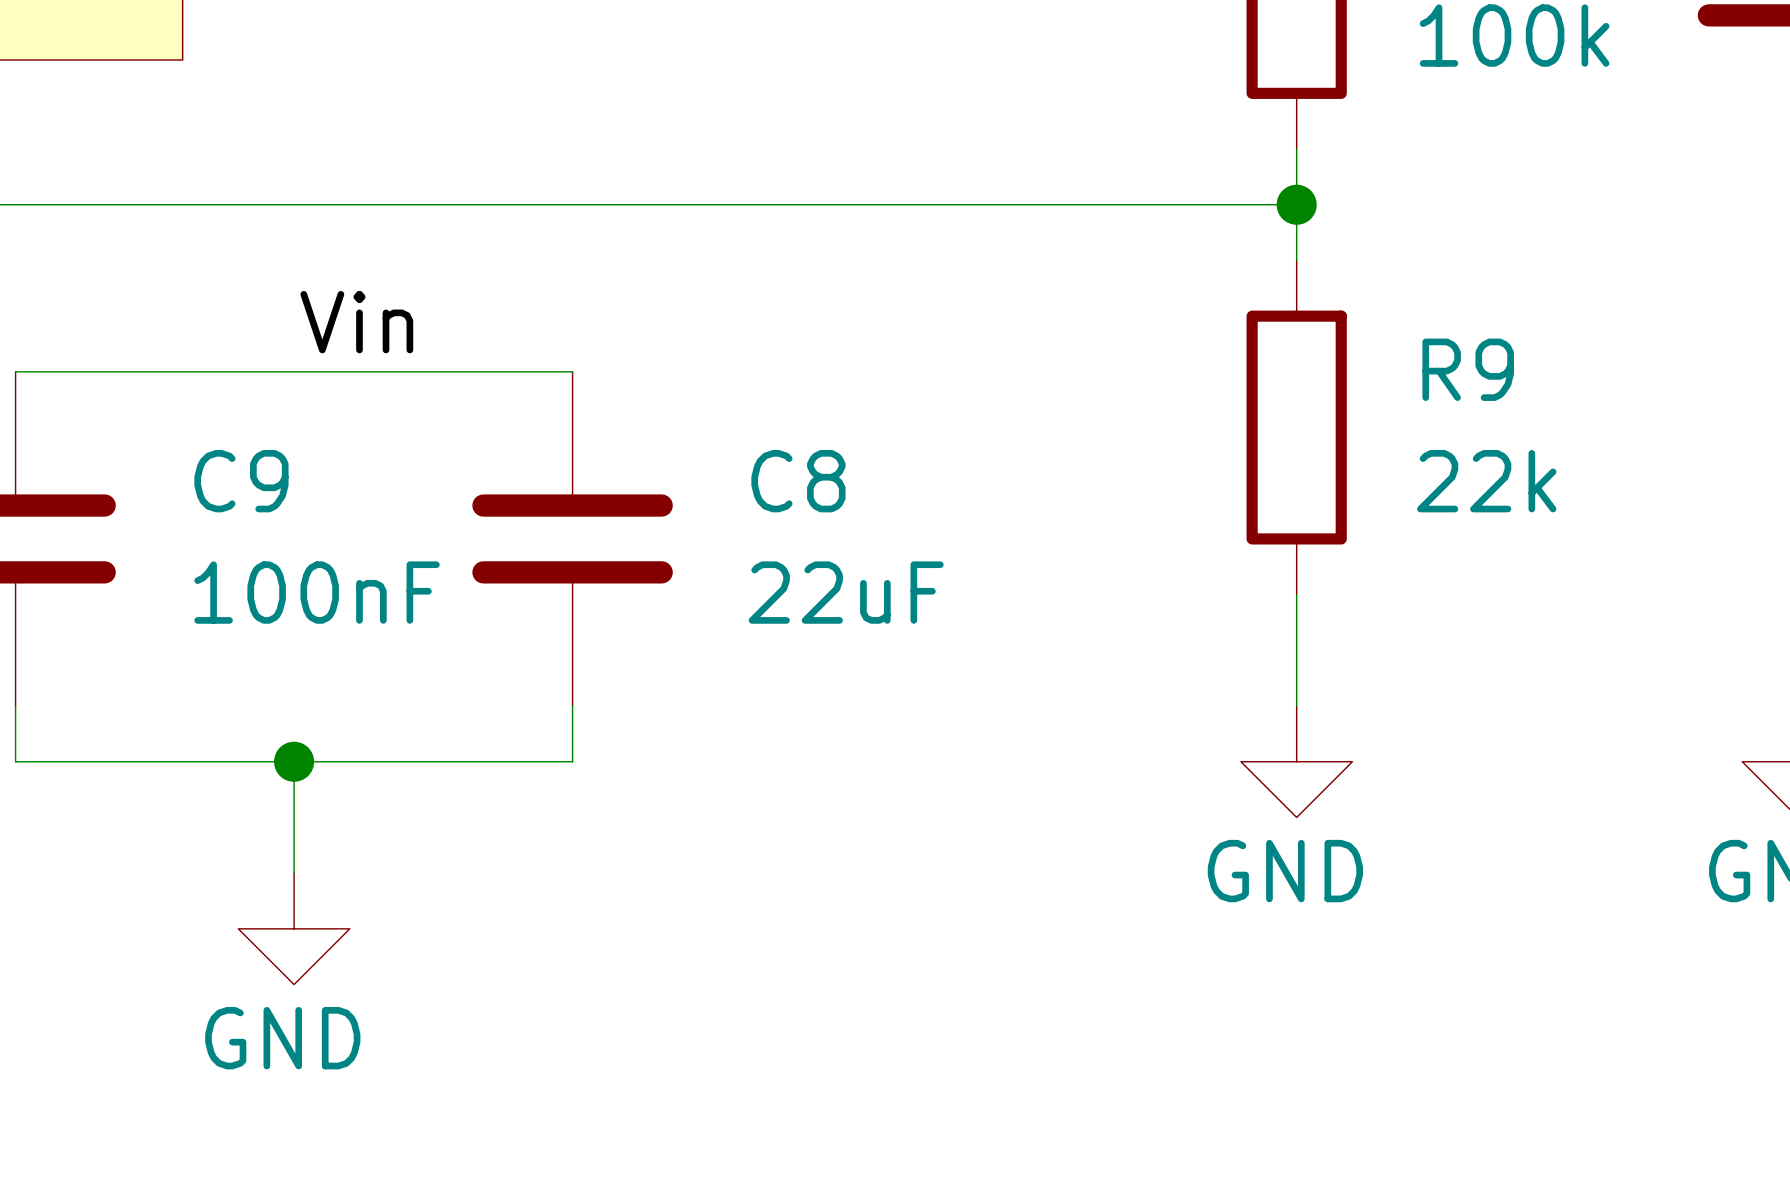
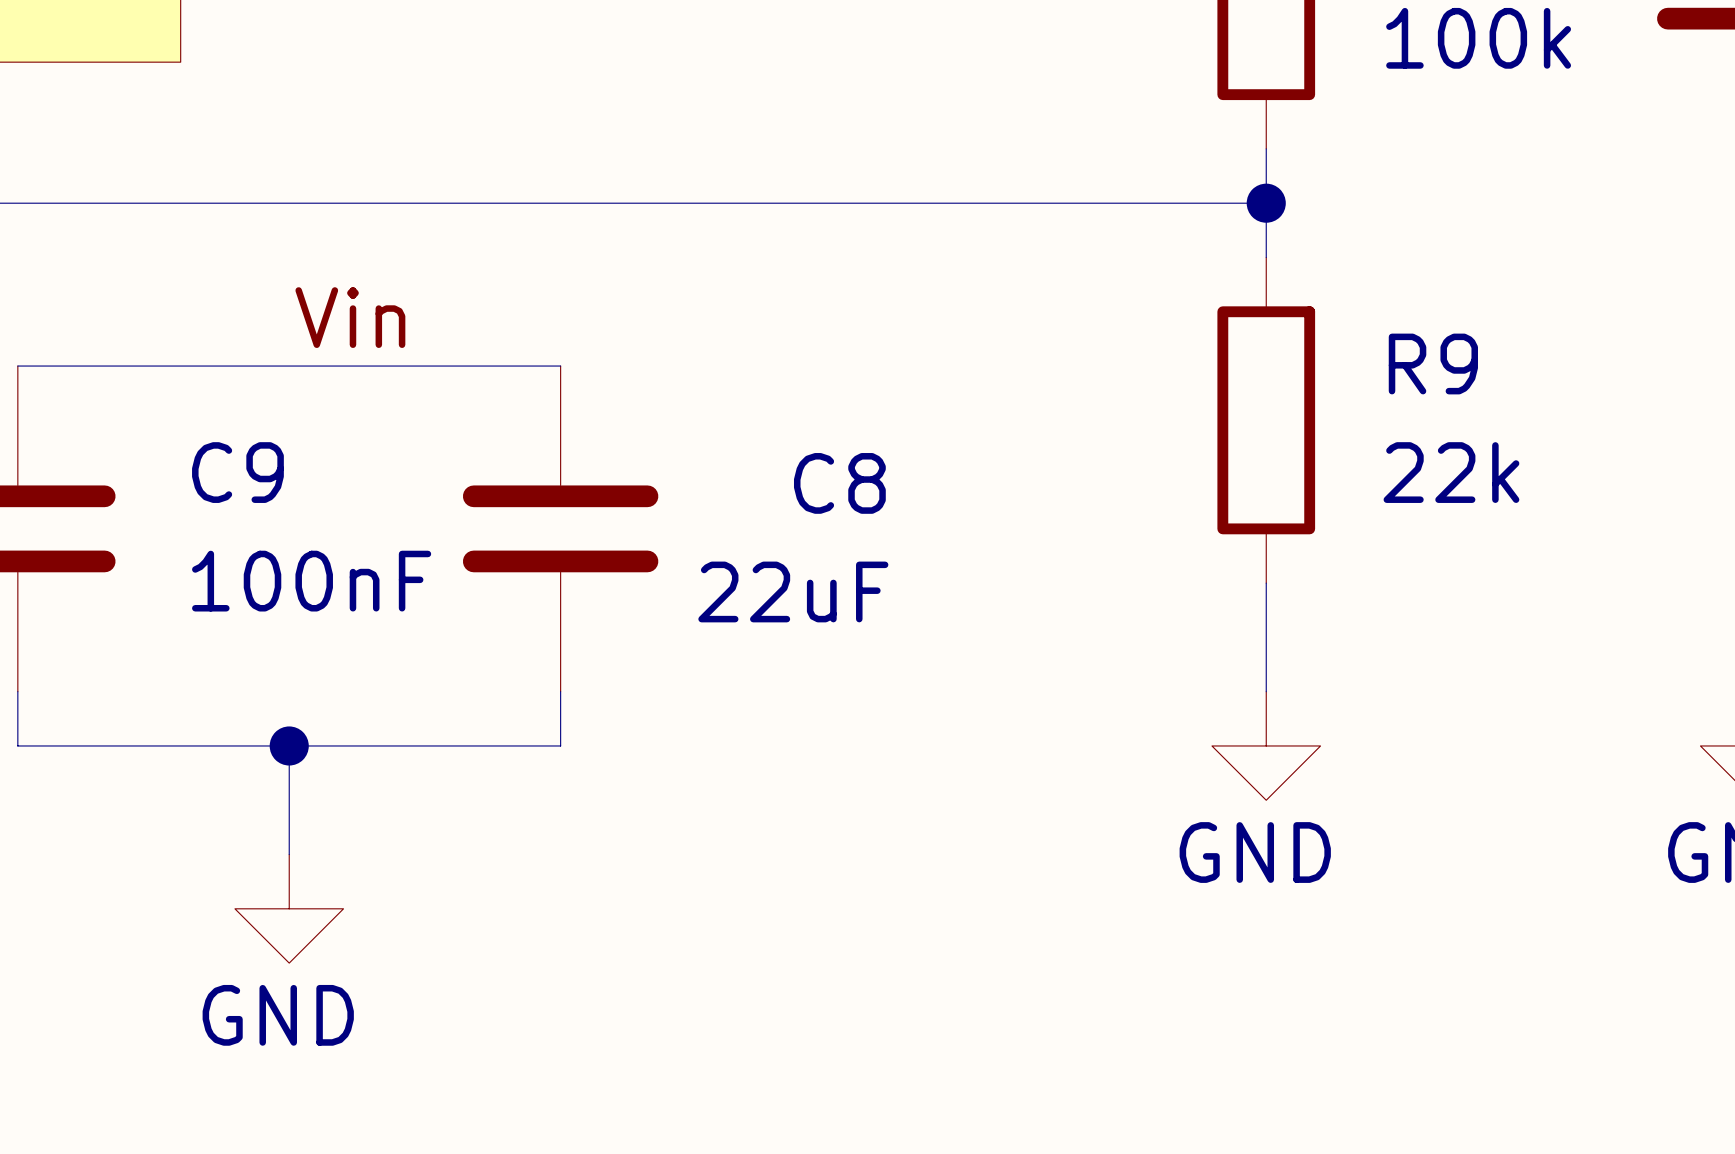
C8 name position: C8 (798, 481) -> C8 (839, 483)
C8 value position: 22uF (846, 592) -> 22uF (793, 591)

